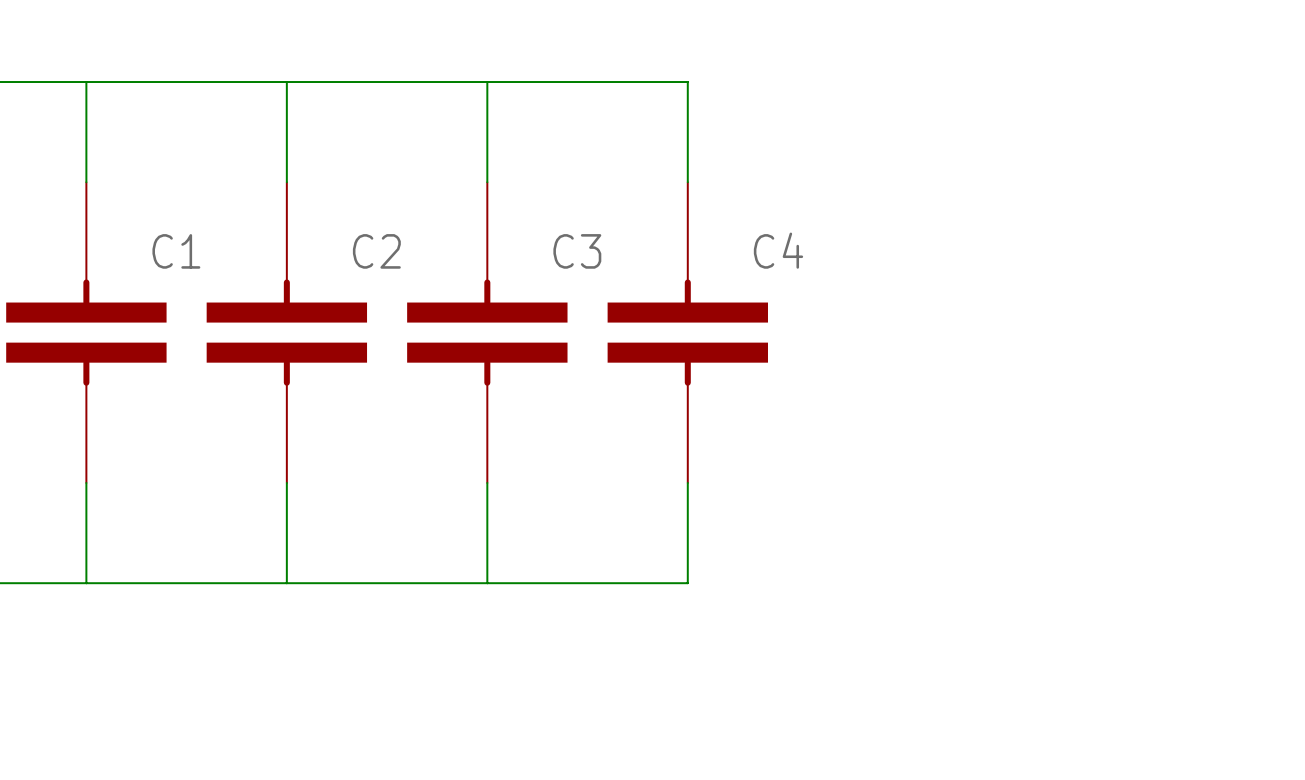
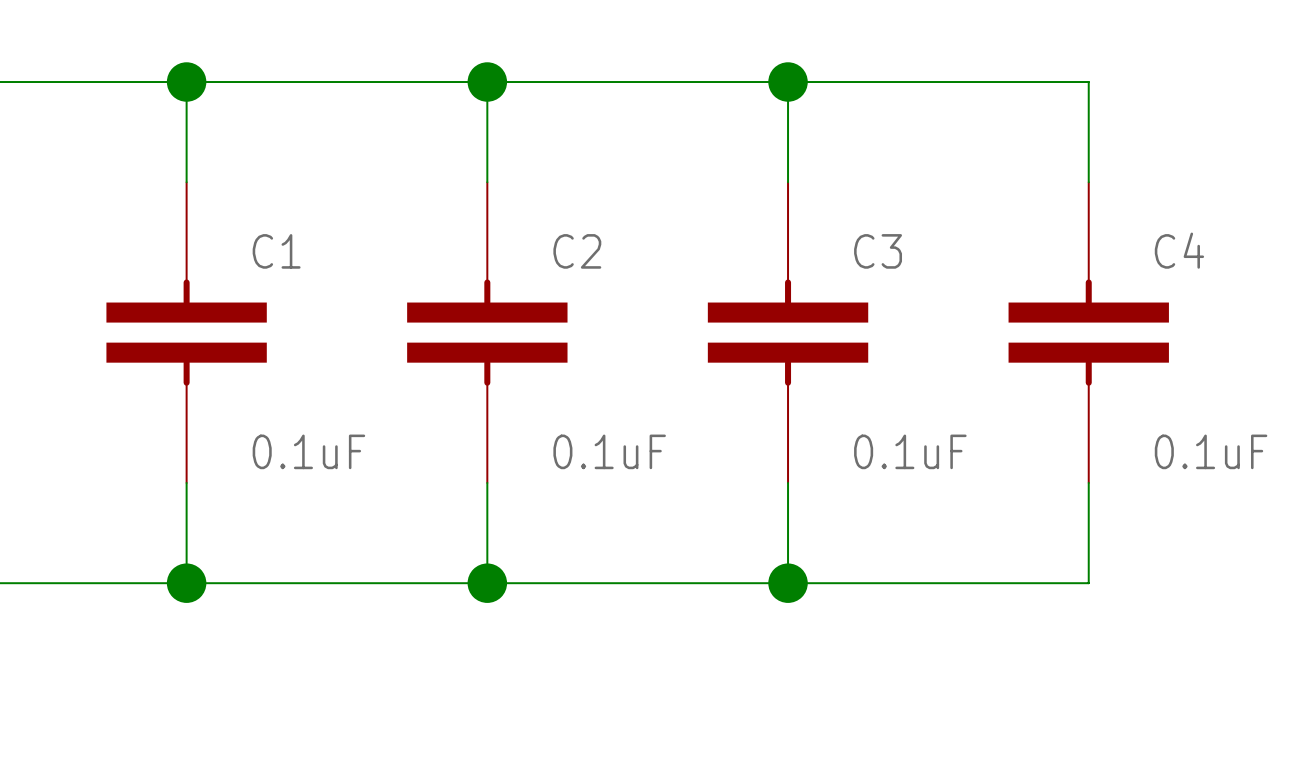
wire: (86, 82) (86, 182) -> (186, 82) (186, 182)
junction: none -> (186, 82)
wire: (286, 82) (286, 182) -> (788, 82) (788, 182)
junction: none -> (487, 82)
wire: (687, 82) (687, 182) -> (687, 82) (1088, 82) (1088, 182)
junction: none -> (788, 82)
C3 name: C3 (577, 251) -> C2 (577, 251)
C1 position: (86, 332) -> (186, 332)
C2: (286, 332) -> none
C4 position: (687, 332) -> (1088, 332)
C3: none -> 0.1uF (788, 332)
C1 value: none -> 0.1uF (308, 451)
C3 value: none -> 0.1uF (609, 451)
C4 value: none -> 0.1uF (1211, 451)
wire: (86, 482) (86, 583) -> (186, 482) (186, 583)
wire: (286, 482) (286, 583) -> (788, 482) (788, 583)
wire: (687, 482) (687, 583) -> (1088, 482) (1088, 583) (687, 583)
junction: none -> (186, 583)
junction: none -> (487, 583)
junction: none -> (788, 583)

